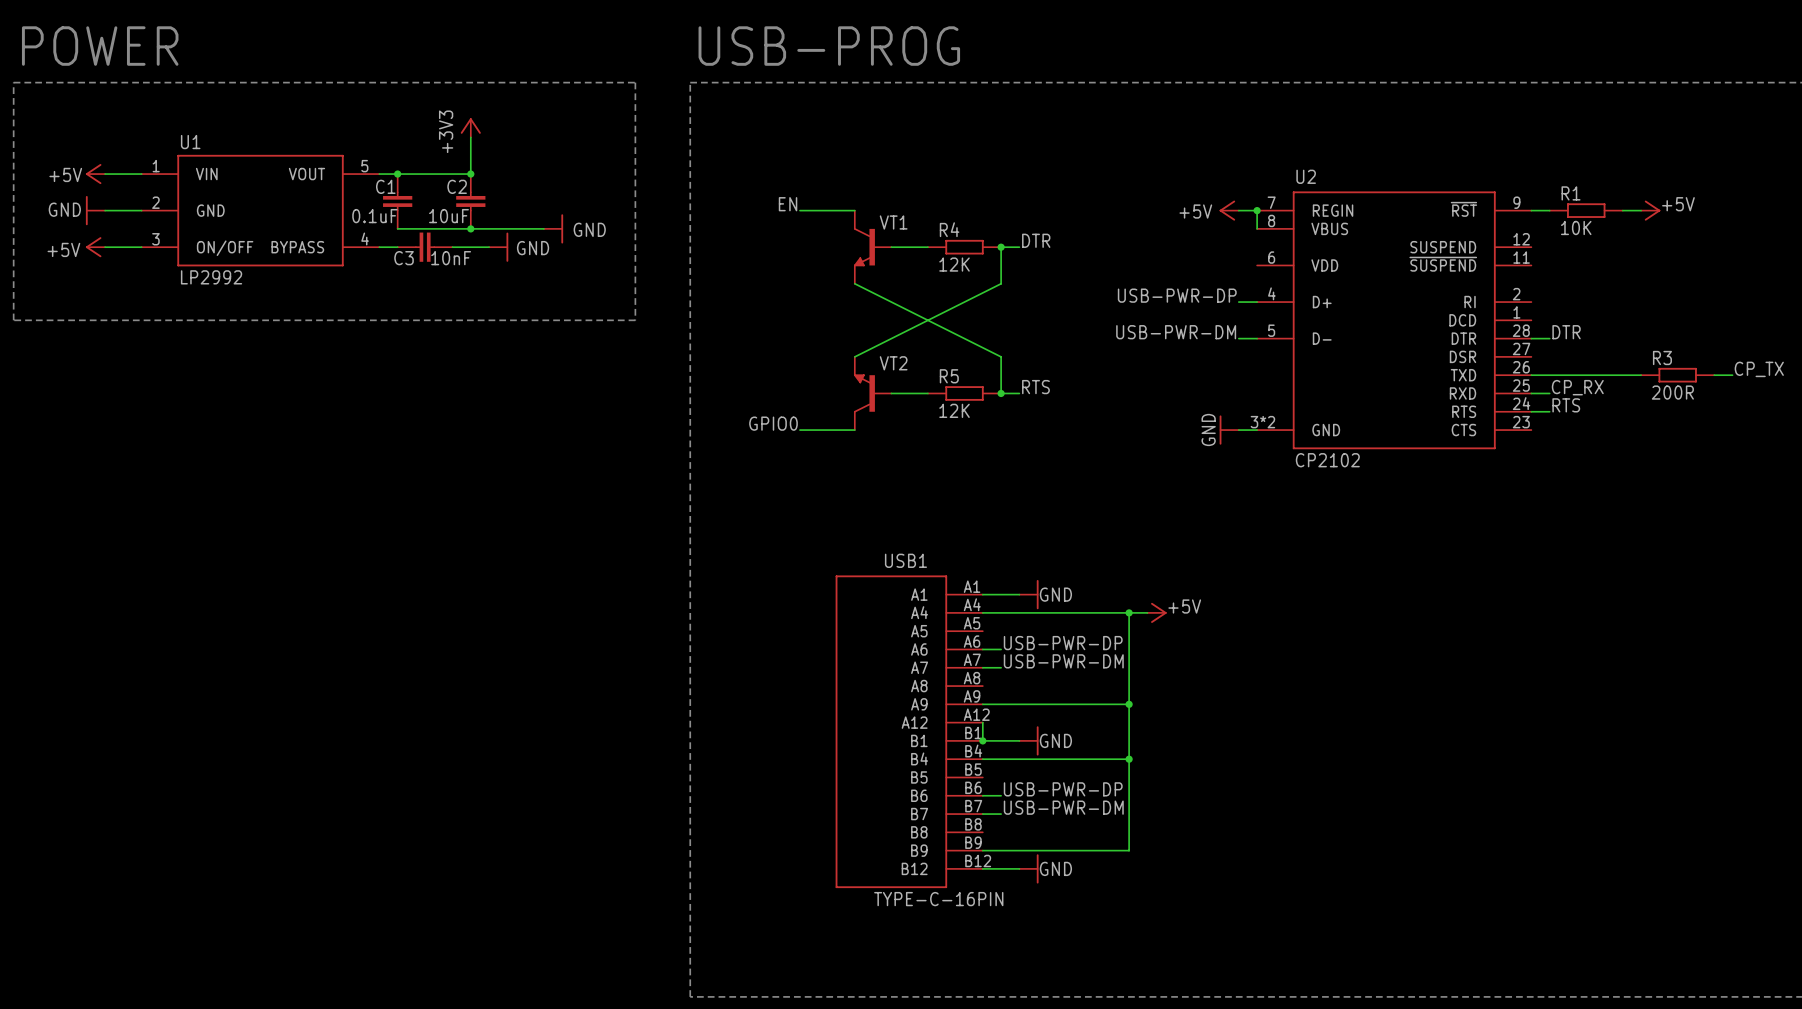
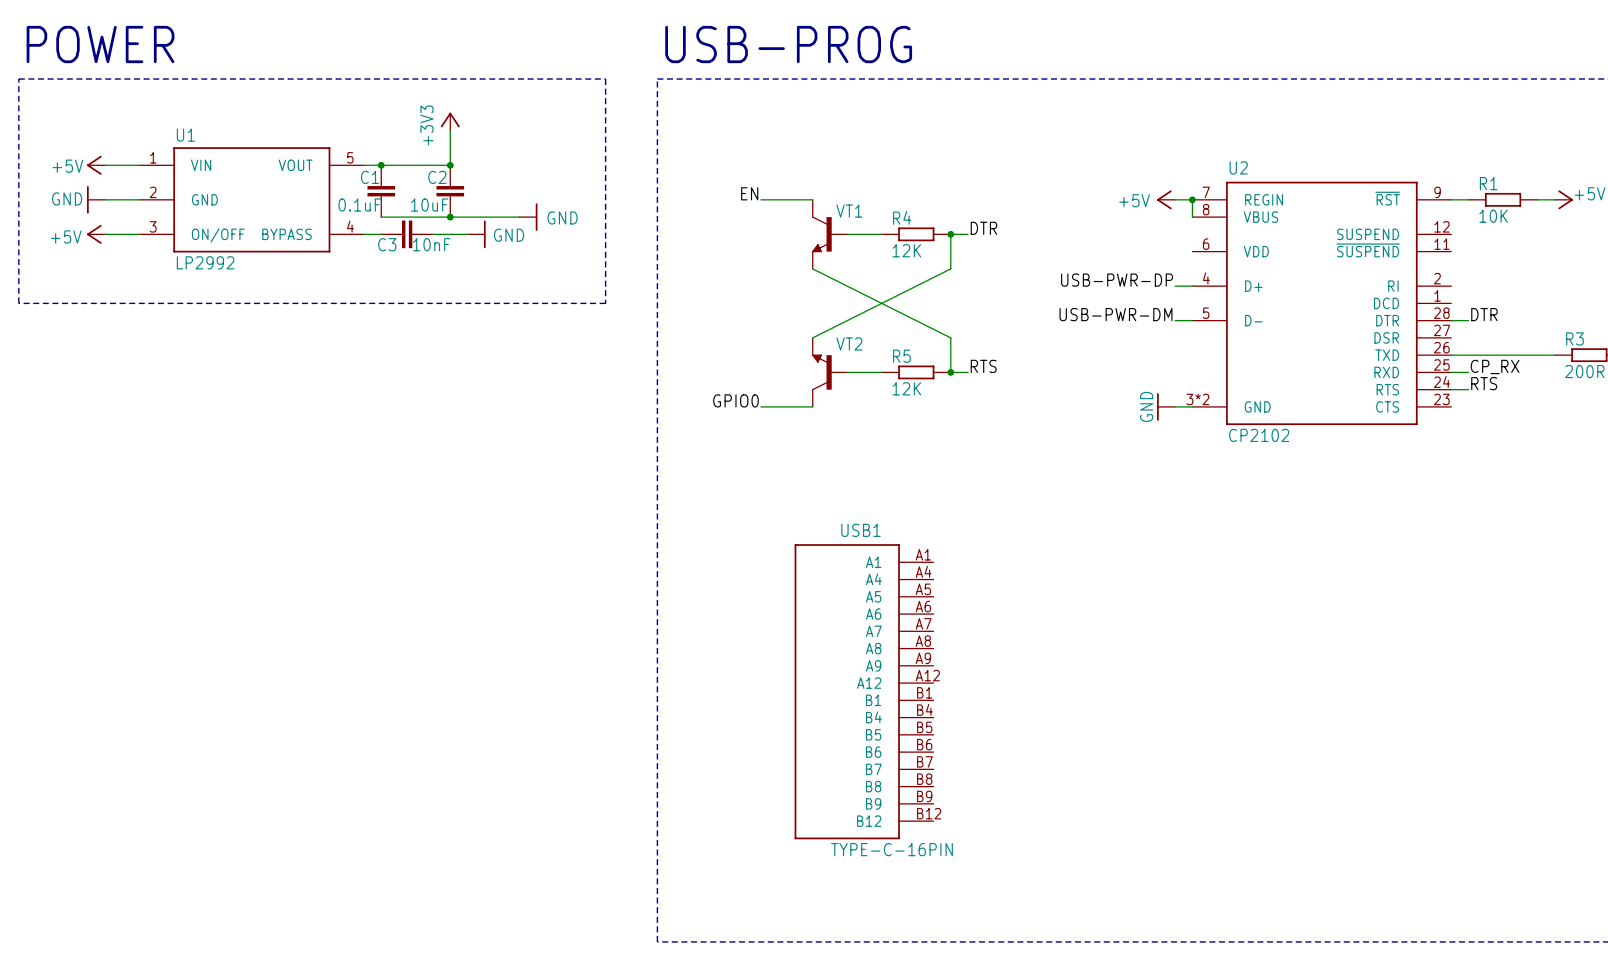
wire: (982, 594) (1019, 594) -> none
power symbol: GND (1028, 594) -> none
wire: (982, 612) (1147, 612) -> none
wire: (1129, 612) (1129, 850) (982, 850) -> none
junction: (1129, 612) -> none
power symbol: +5V (1156, 612) -> none
label: USB-PWR-DP (1063, 643) -> none
wire: (982, 649) (1001, 649) -> none
label: USB-PWR-DM (1063, 661) -> none
wire: (982, 667) (1001, 667) -> none
wire: (982, 704) (1129, 704) -> none
junction: (1129, 704) -> none
wire: (982, 722) (982, 740) (1019, 740) -> none
junction: (982, 740) -> none
power symbol: GND (1028, 740) -> none
wire: (982, 759) (1129, 759) -> none
junction: (1129, 759) -> none
label: USB-PWR-DP (1063, 789) -> none
wire: (982, 795) (1001, 795) -> none
label: USB-PWR-DM (1063, 807) -> none
wire: (982, 814) (1001, 814) -> none
wire: (982, 868) (1019, 868) -> none
power symbol: GND (1028, 868) -> none

